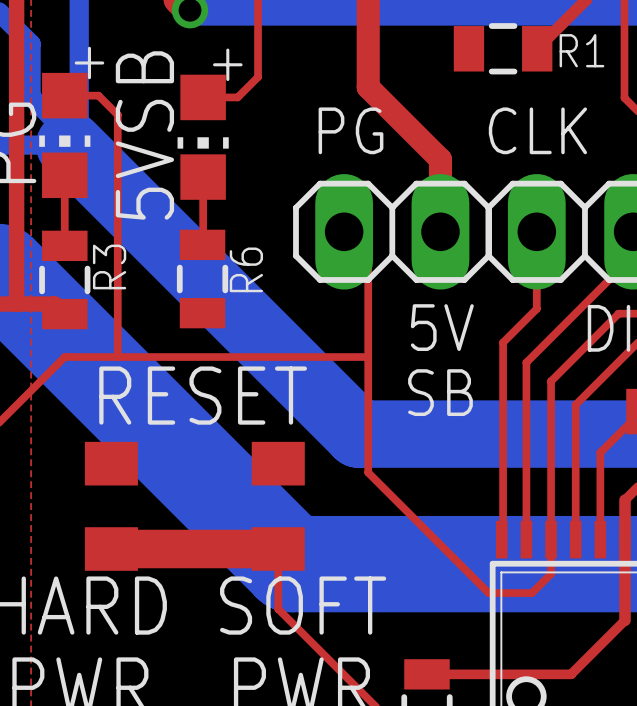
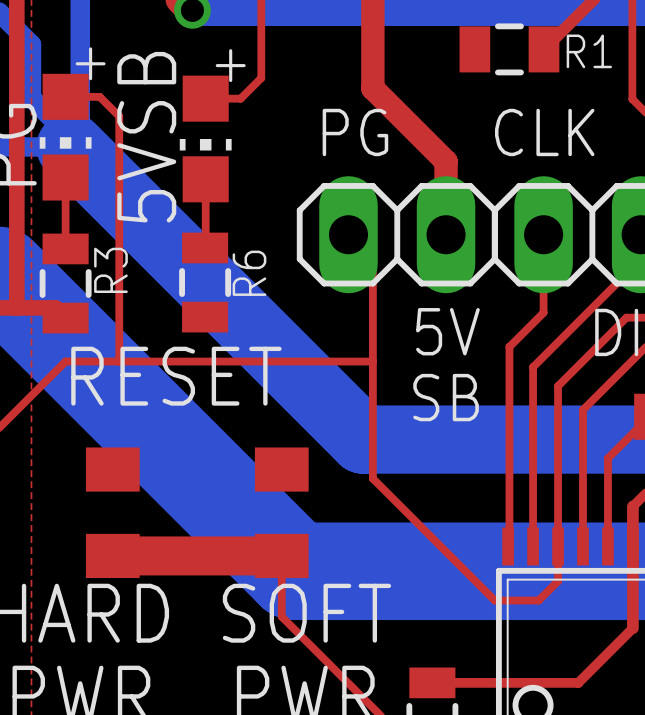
text position: RESET (203, 395) -> RESET (176, 376)

